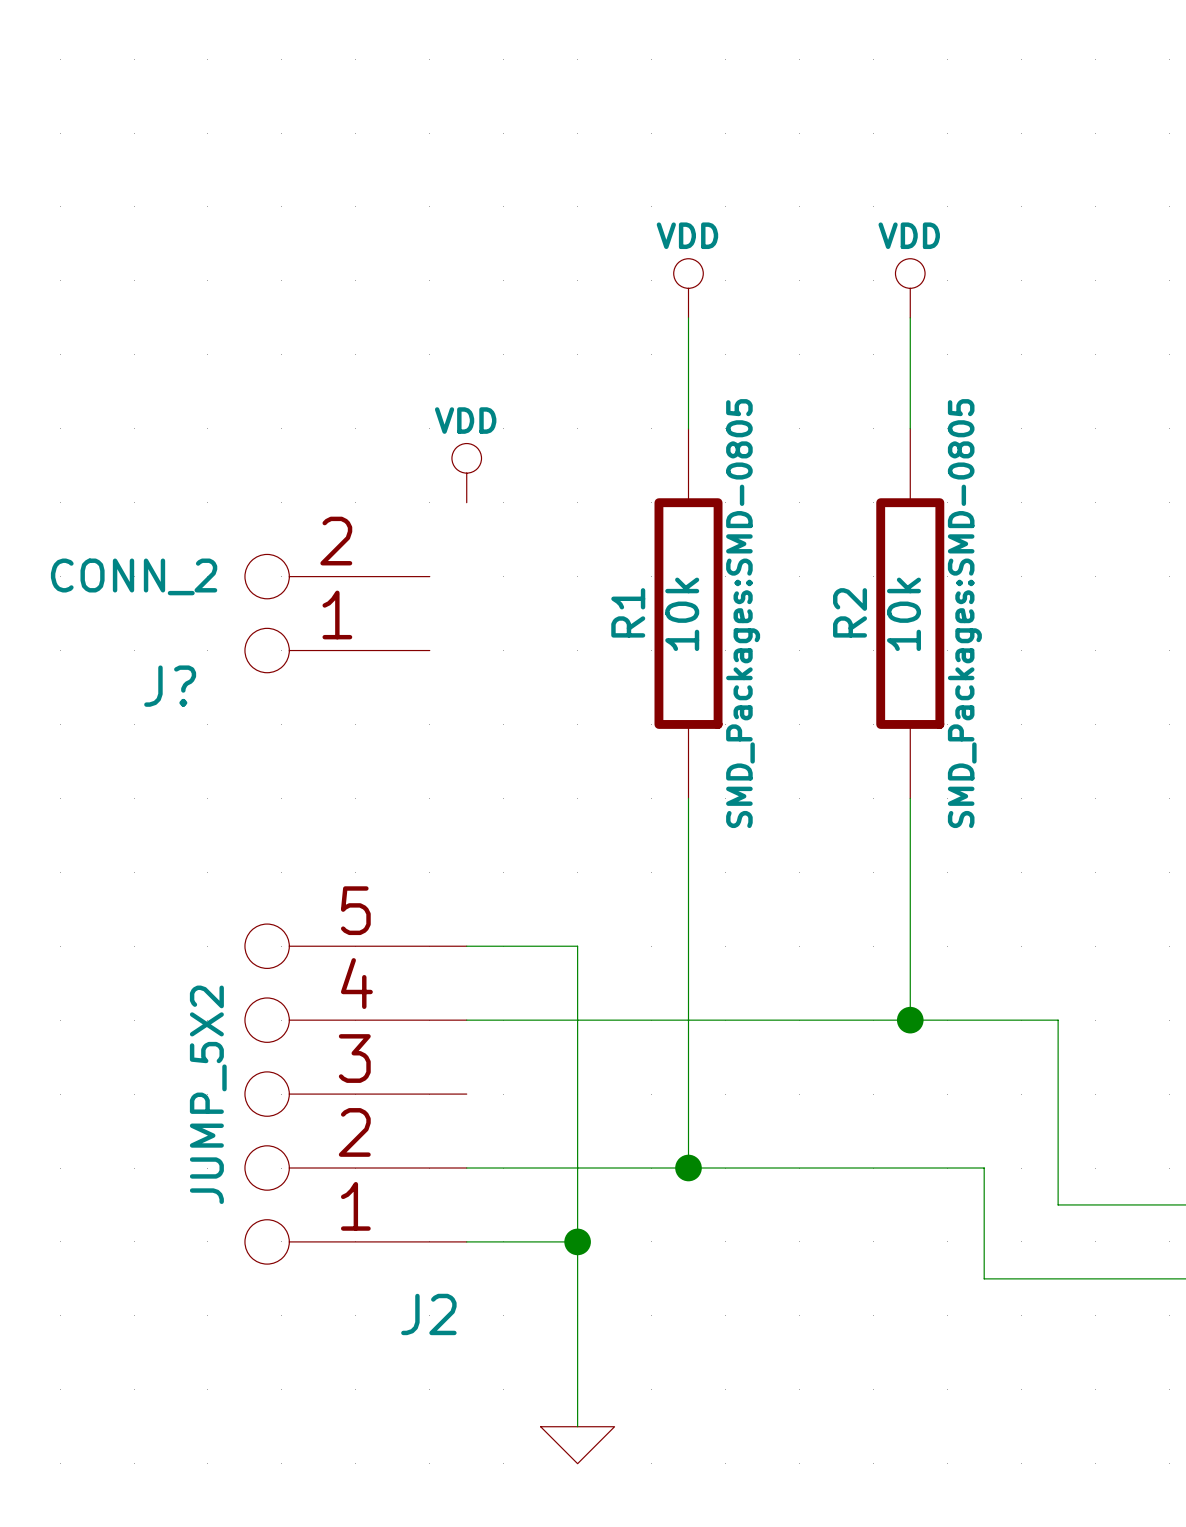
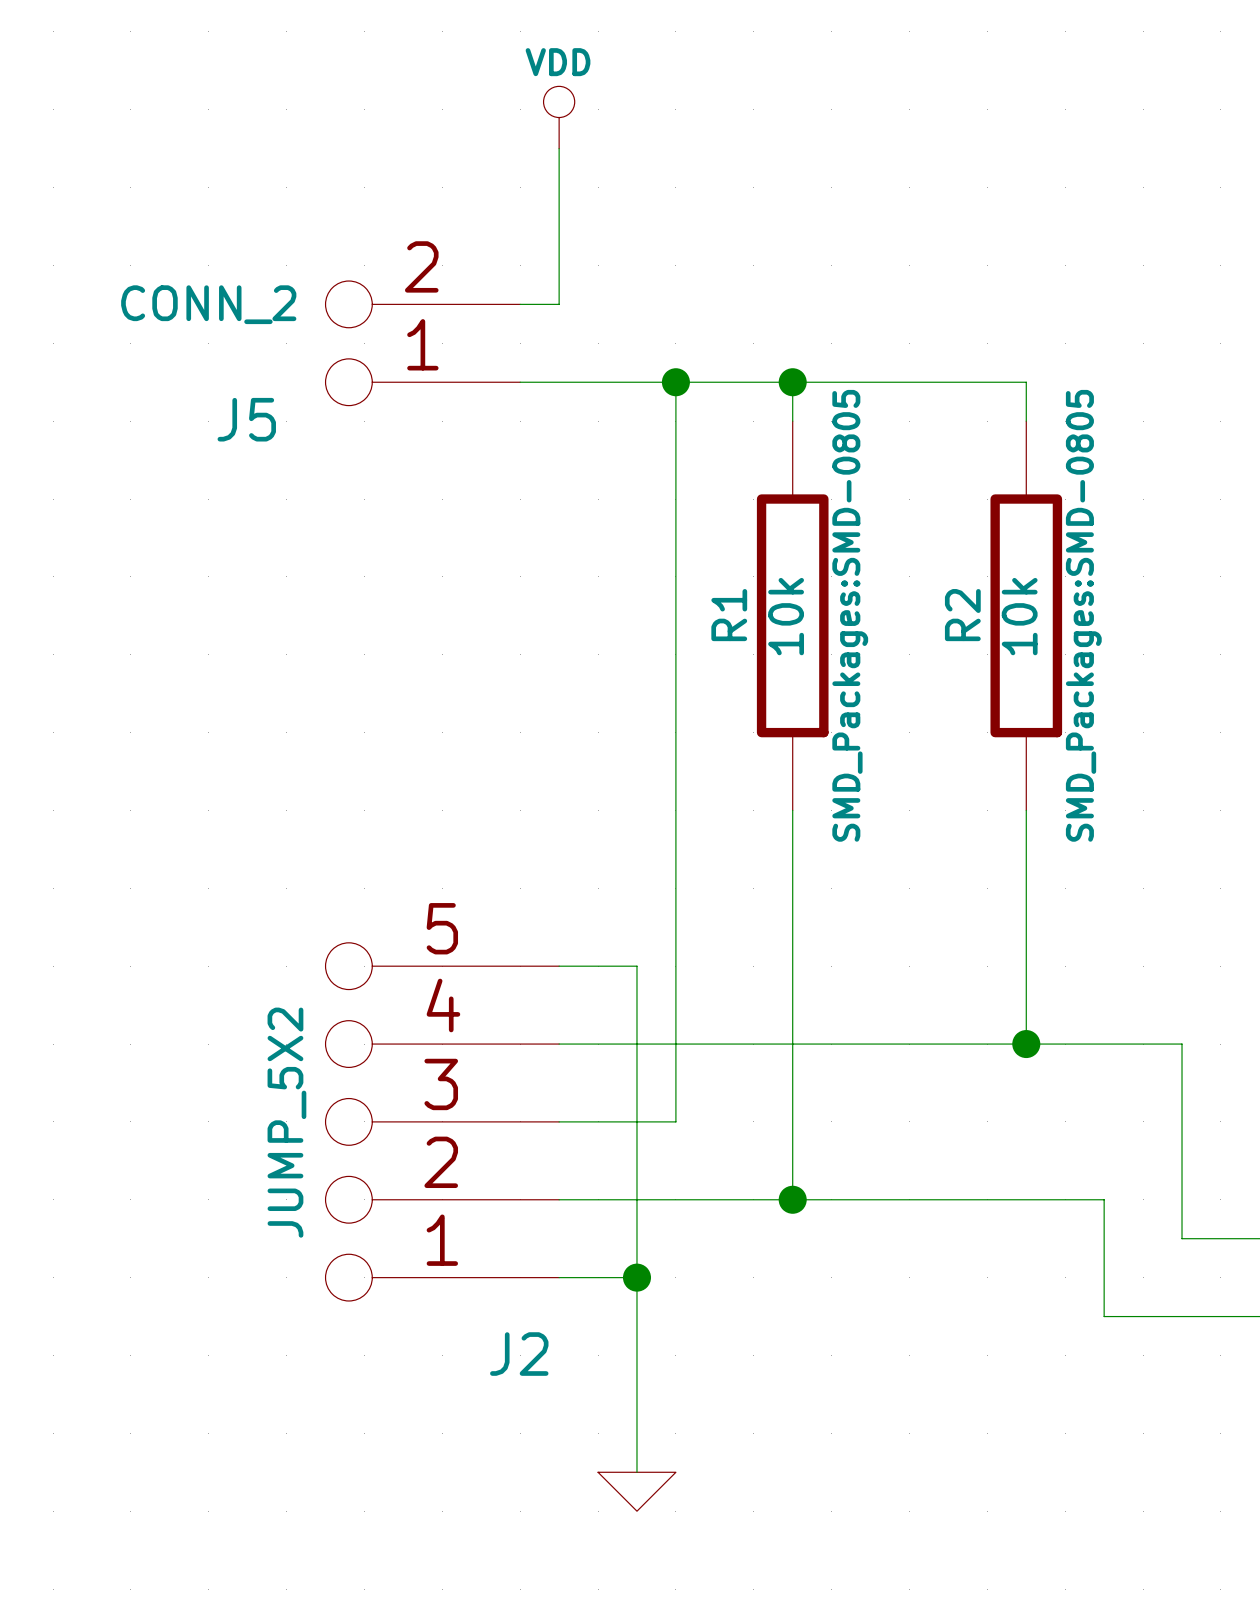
power symbol: none -> VDD (559, 117)
wire: none -> (559, 148) (559, 304) (520, 304)
power symbol: VDD (688, 288) -> none
power symbol: VDD (910, 288) -> none
wire: (688, 317) (688, 391) -> none
wire: (910, 317) (910, 391) -> (520, 382) (1026, 382)
J5: none -> CONN_2 (422, 343)
wire: none -> (675, 382) (675, 966)
junction: none -> (675, 382)
junction: none -> (792, 382)
power symbol: VDD (466, 473) -> none
J?: CONN_2 (337, 613) -> none
wire: (540, 946) (577, 946) -> (636, 966) (636, 1472)
wire: (577, 1094) (577, 1426) -> (675, 1121) (559, 1121)
wire: (540, 1241) (577, 1241) -> none
junction position: (577, 1241) -> (636, 1277)
power symbol position: (577, 1445) -> (636, 1491)

